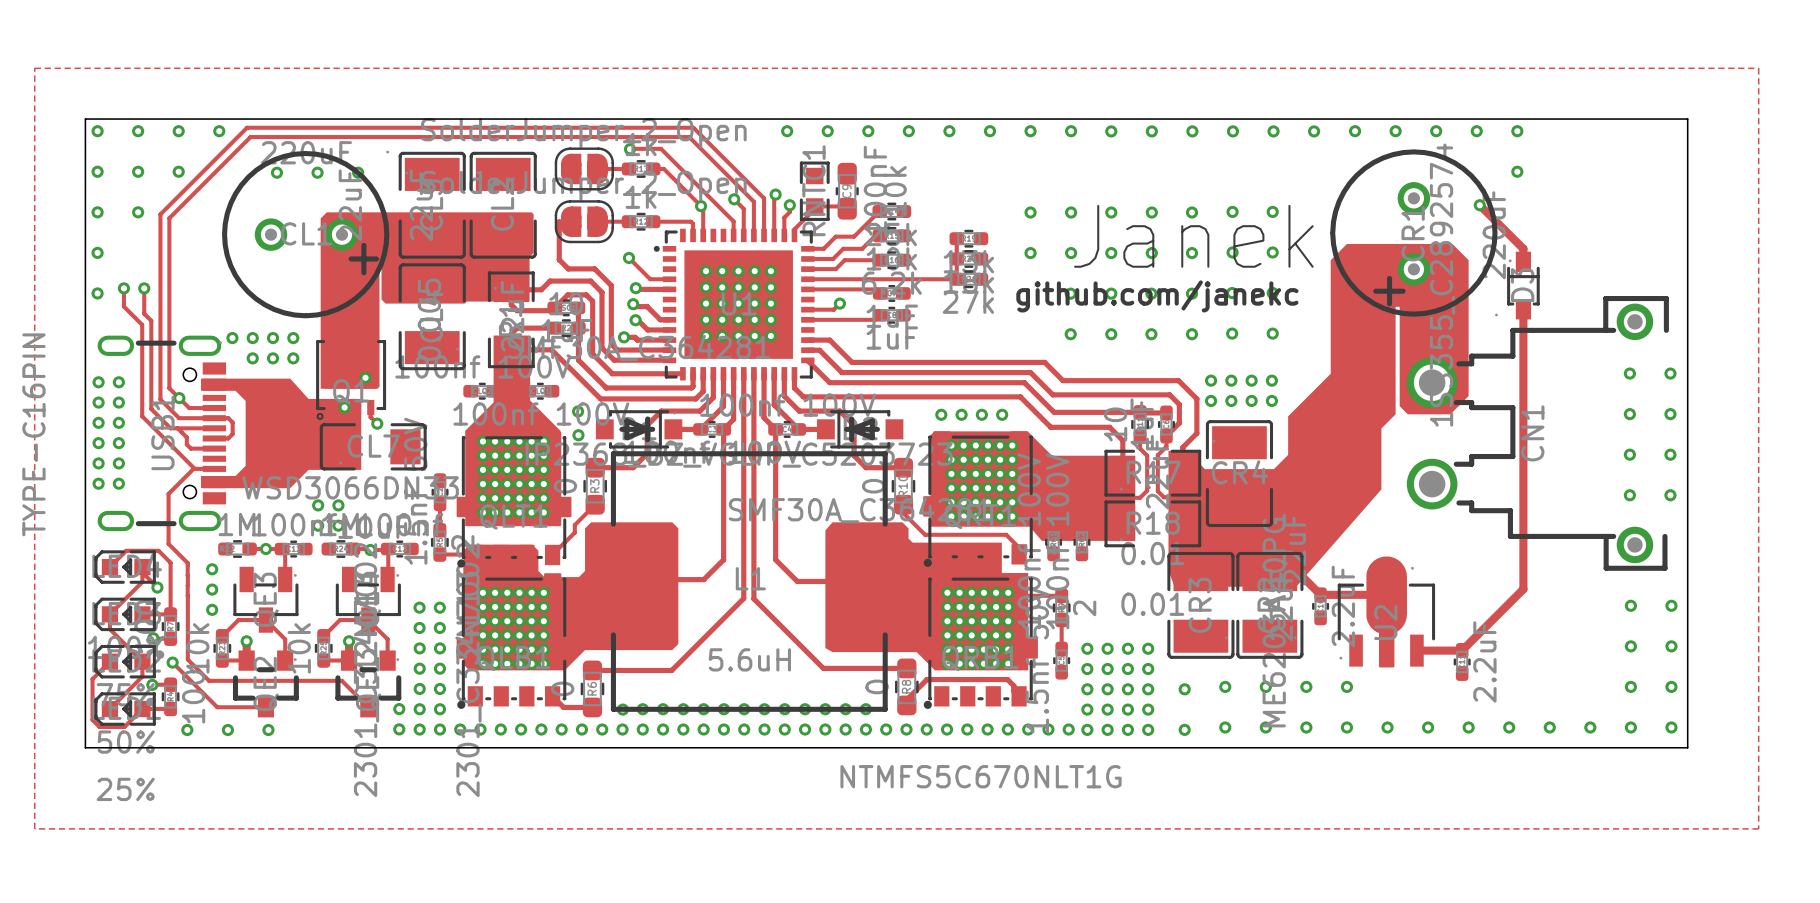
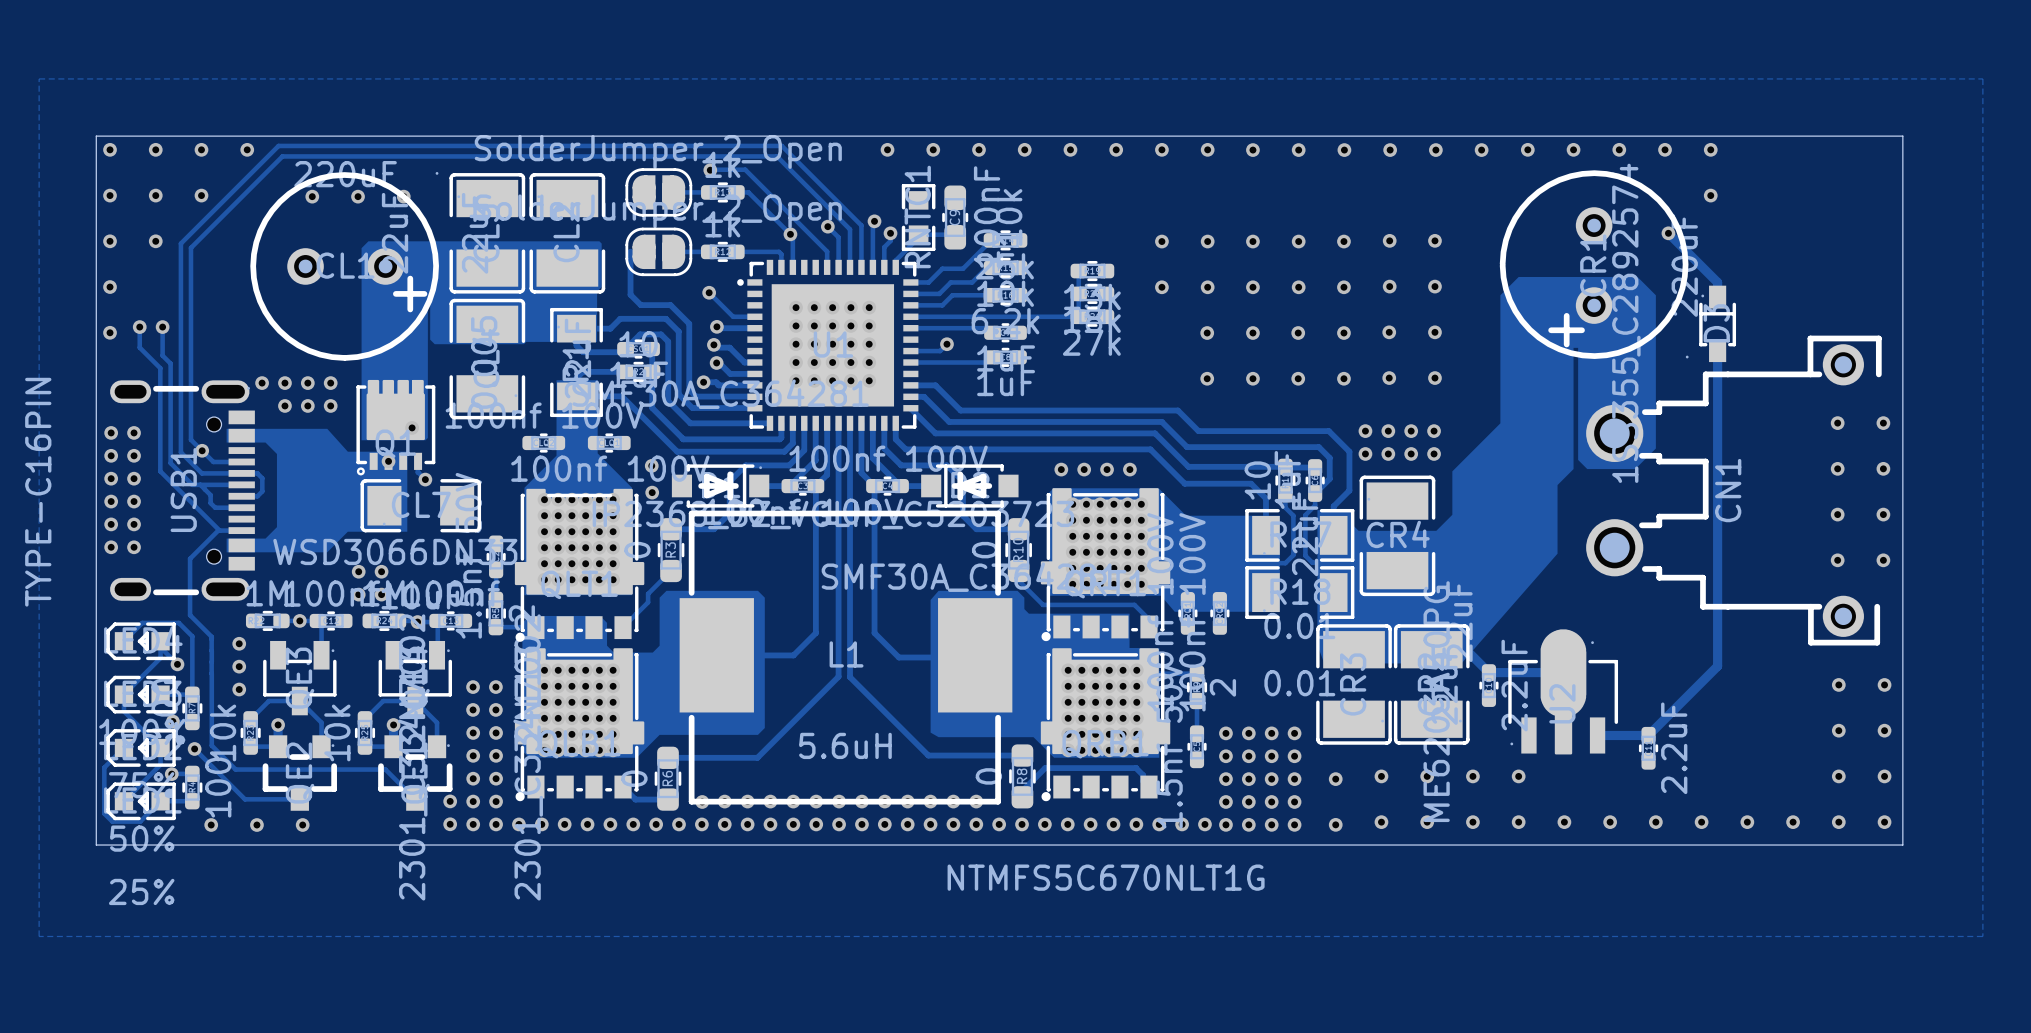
text: Janek (1193, 236) -> none
text: github.com/janekc (1157, 296) -> none

